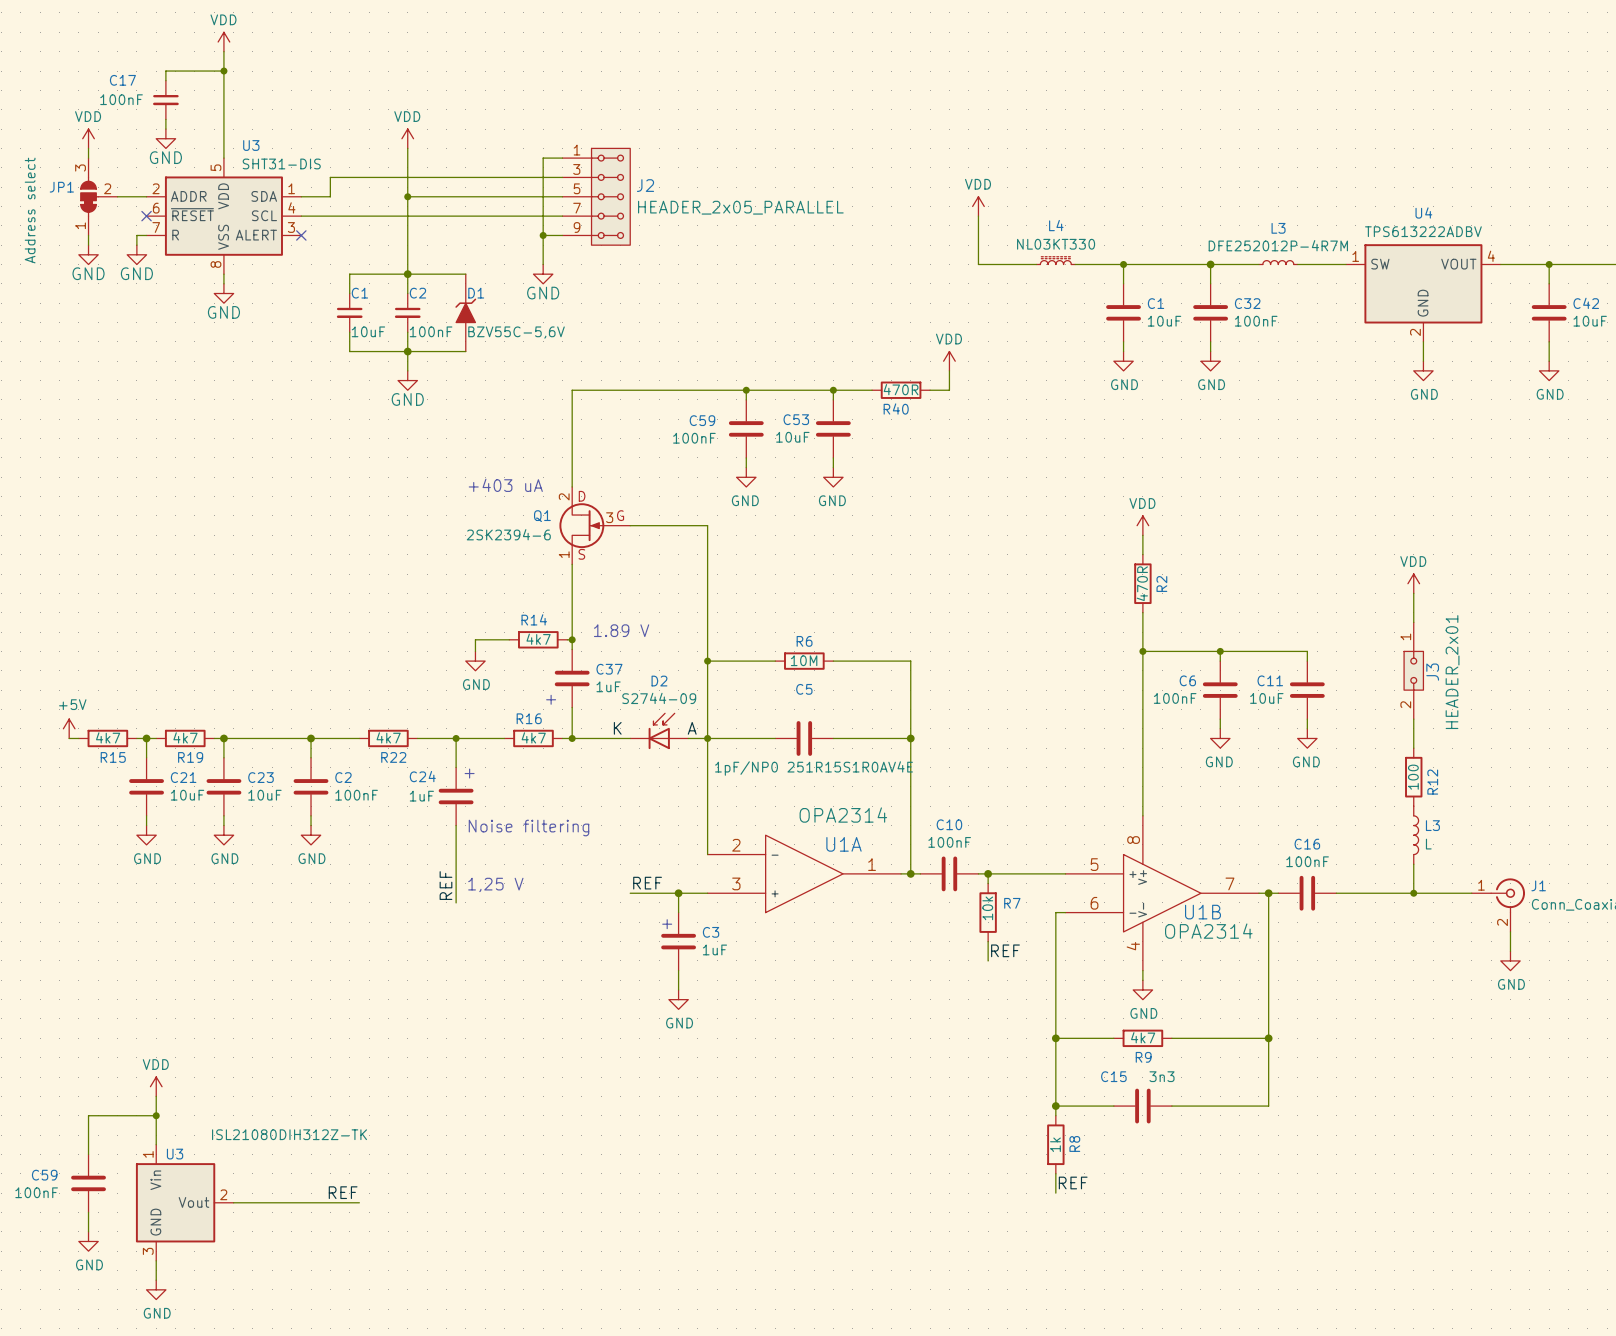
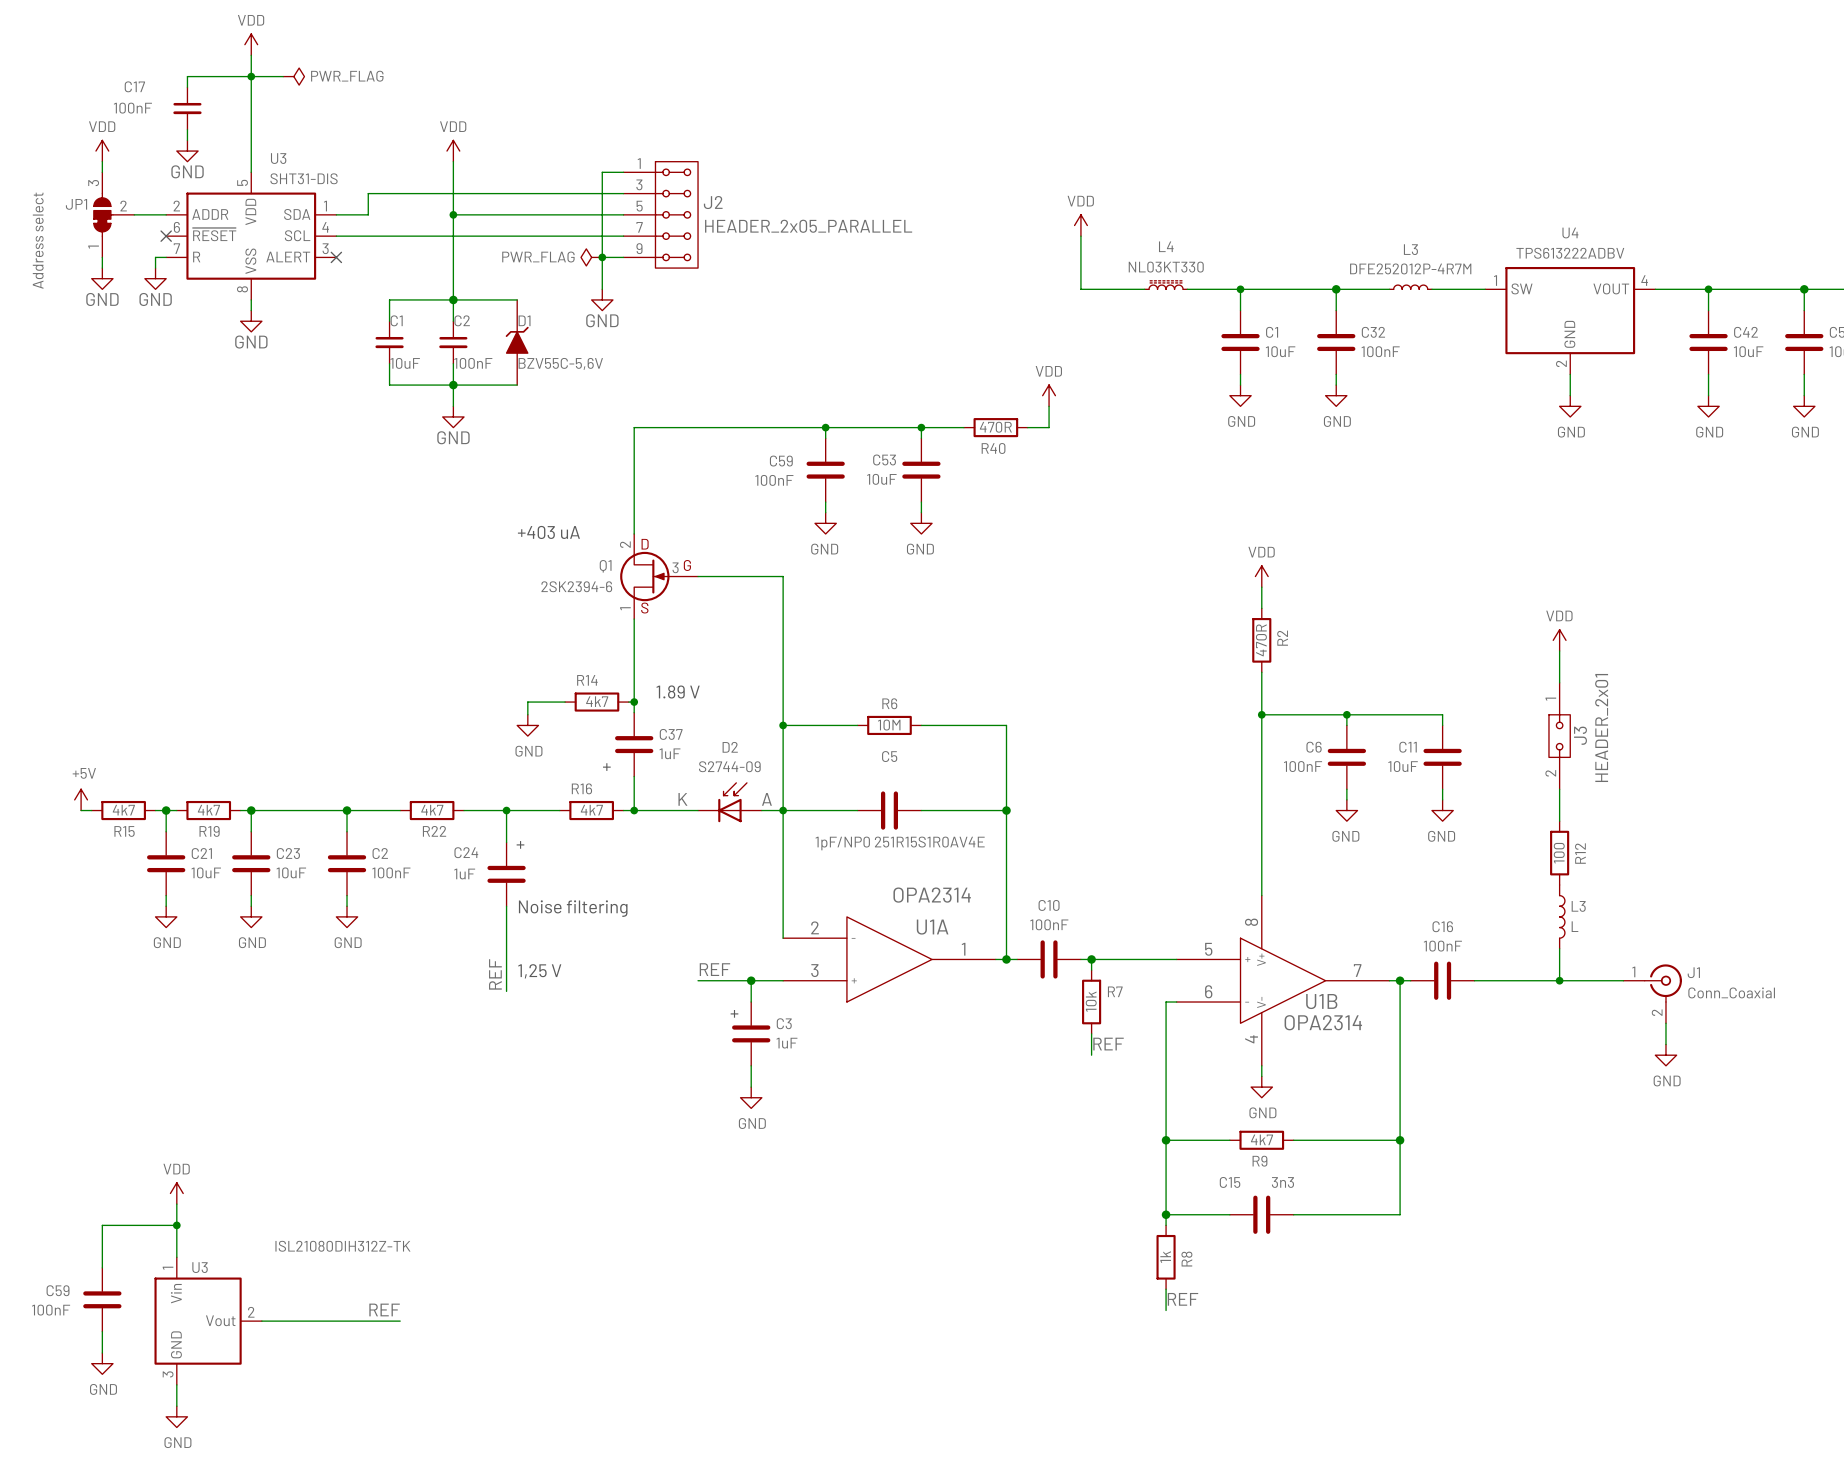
wire: none -> (251, 76) (283, 76)
power symbol: none -> PWR_FLAG (293, 76)
power symbol: none -> PWR_FLAG (591, 257)

